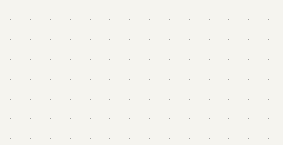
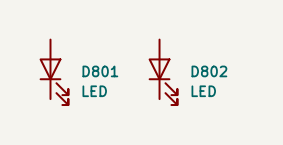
D801: none -> LED (53, 72)
D802: none -> LED (163, 72)

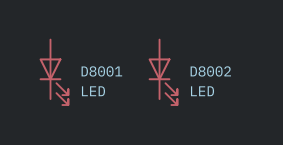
D801 name: D801 (100, 71) -> D8001 (101, 71)
D802 name: D802 (209, 71) -> D8002 (210, 71)

